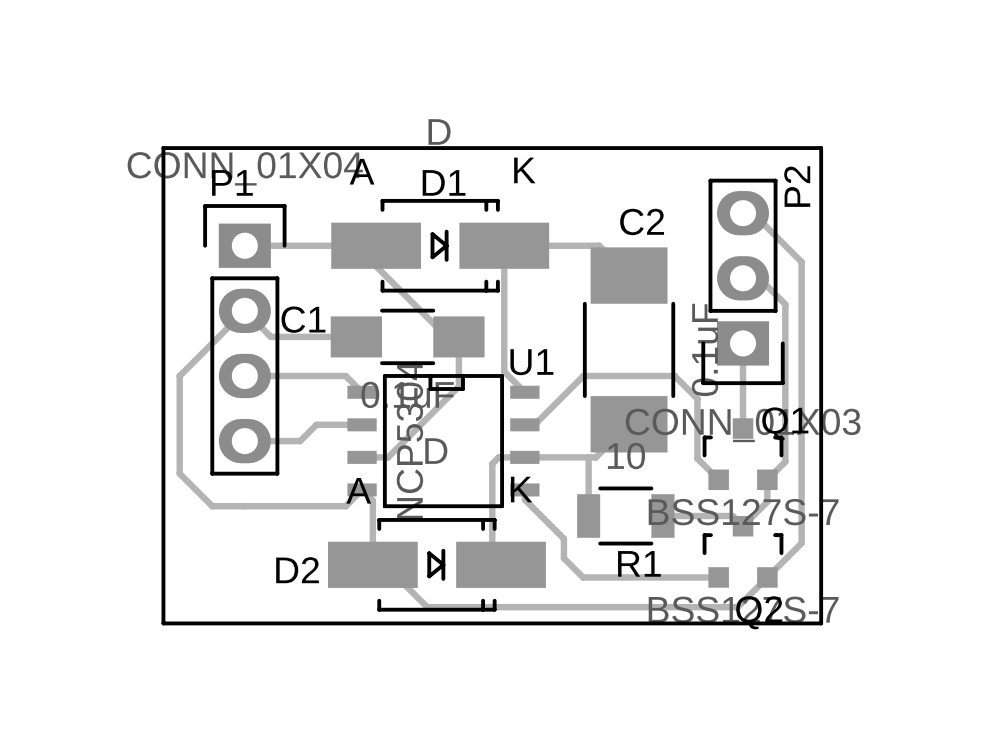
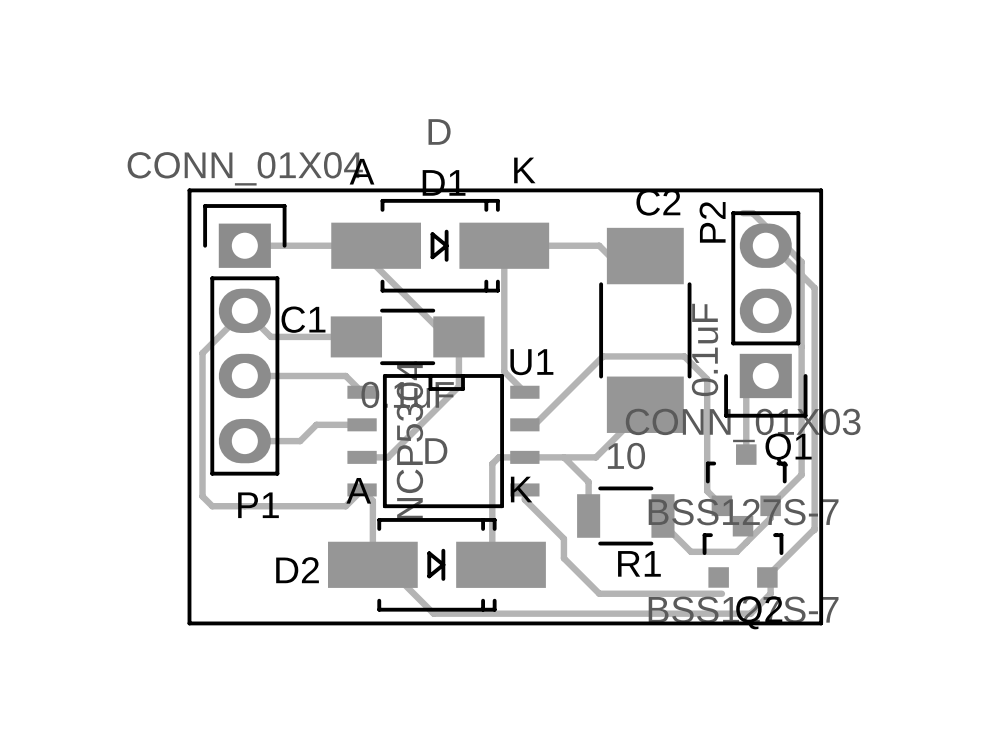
P1 name position: P1 (232, 182) -> P1 (258, 505)
P2 name position: P2 (797, 186) -> P2 (712, 222)
board edge: (821, 190) (821, 148) (163, 148) (163, 623) (189, 623) -> (821, 190) (189, 190) (189, 623)
track: none -> (765, 245) (772, 245) (814, 288) (814, 530)
track: (743, 278) (759, 278) (785, 304) (785, 461) (767, 479) (767, 501) (743, 526) (732, 515) (662, 515) -> (801, 474) (770, 505) (770, 518) (736, 551) (690, 551) (662, 523) (662, 515)
P2 position: (743, 281) -> (765, 314)
track: (743, 343) (743, 428) (740, 428) -> none
C2 position: (629, 349) -> (645, 330)
track: (202, 353) (179, 375) (179, 473) (202, 496) -> (202, 353) (202, 496)
track: (583, 375) (674, 375) (697, 398) (697, 458) (718, 479) -> (583, 375) (603, 356) (684, 356) (707, 379) (707, 491) (721, 505)
track: none -> (765, 375) (746, 395) (746, 454)
Q1 position: (743, 454) -> (746, 480)
track: (588, 457) (588, 482) -> (563, 457) (588, 482)
track: (801, 474) (801, 543) (737, 607) (427, 607) -> (814, 529) (770, 573) (770, 593) (750, 613) (433, 613) (427, 607)
track: (583, 577) (718, 577) -> (583, 577) (599, 593) (721, 593)

